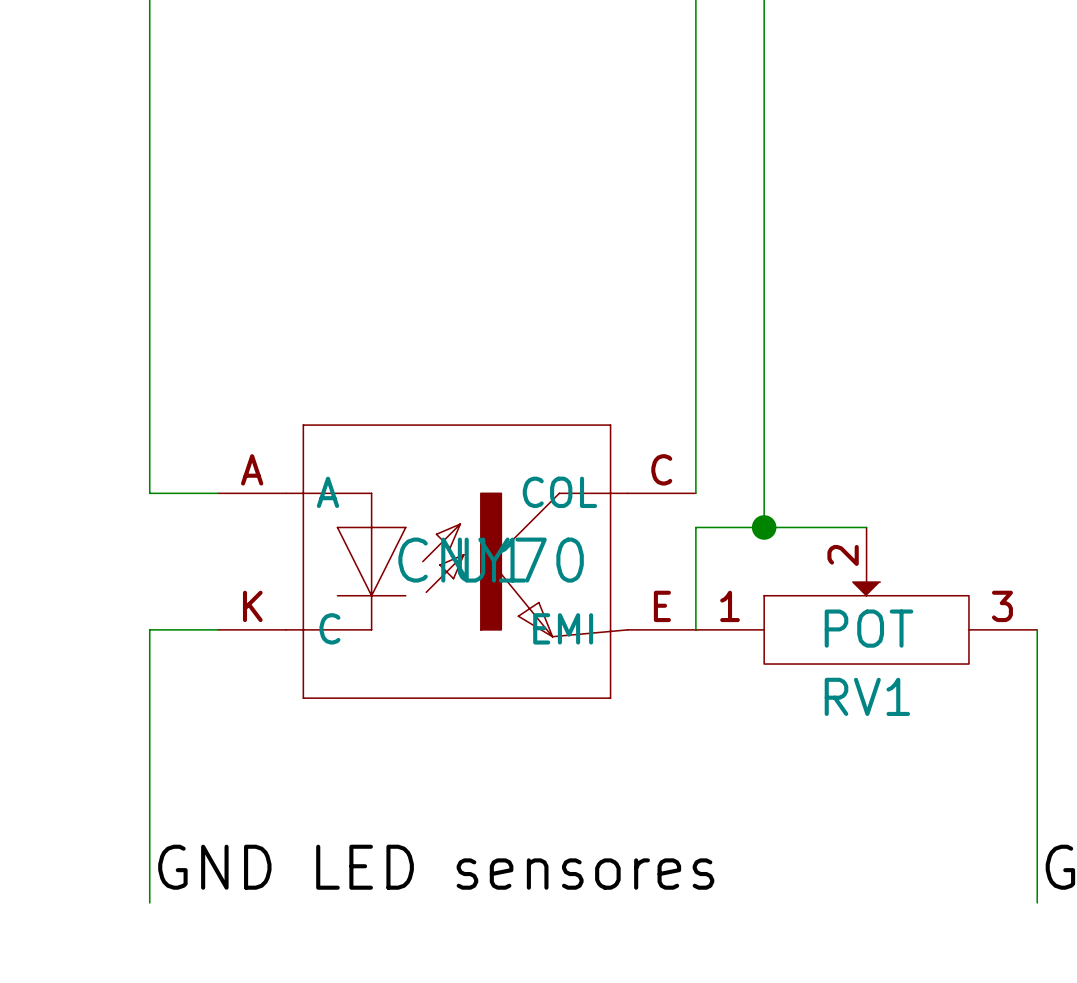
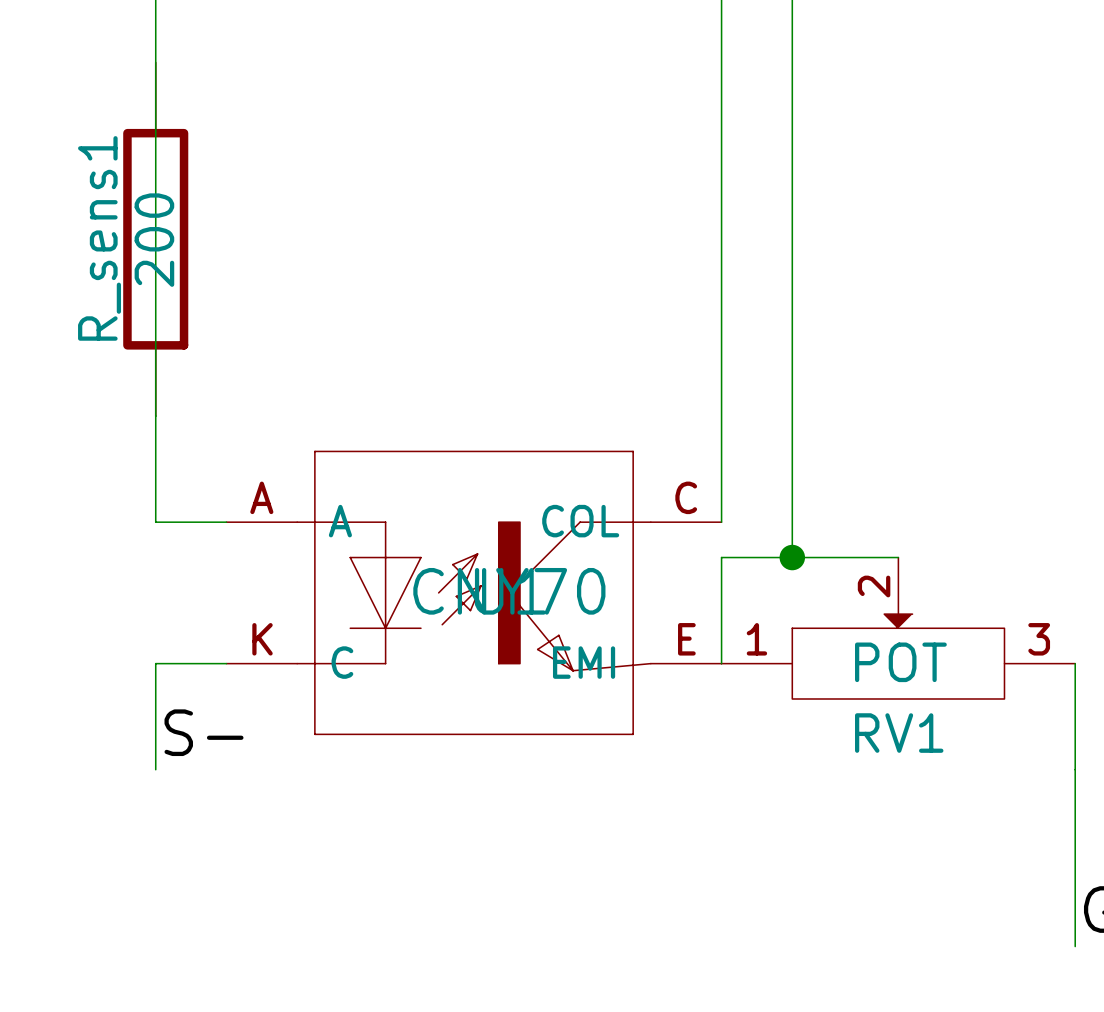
R_sens1: none -> 200 (155, 239)
label: none -> S- (204, 732)
wire: (149, 732) (149, 902) -> none
label: GND LED sensores (436, 867) -> none

